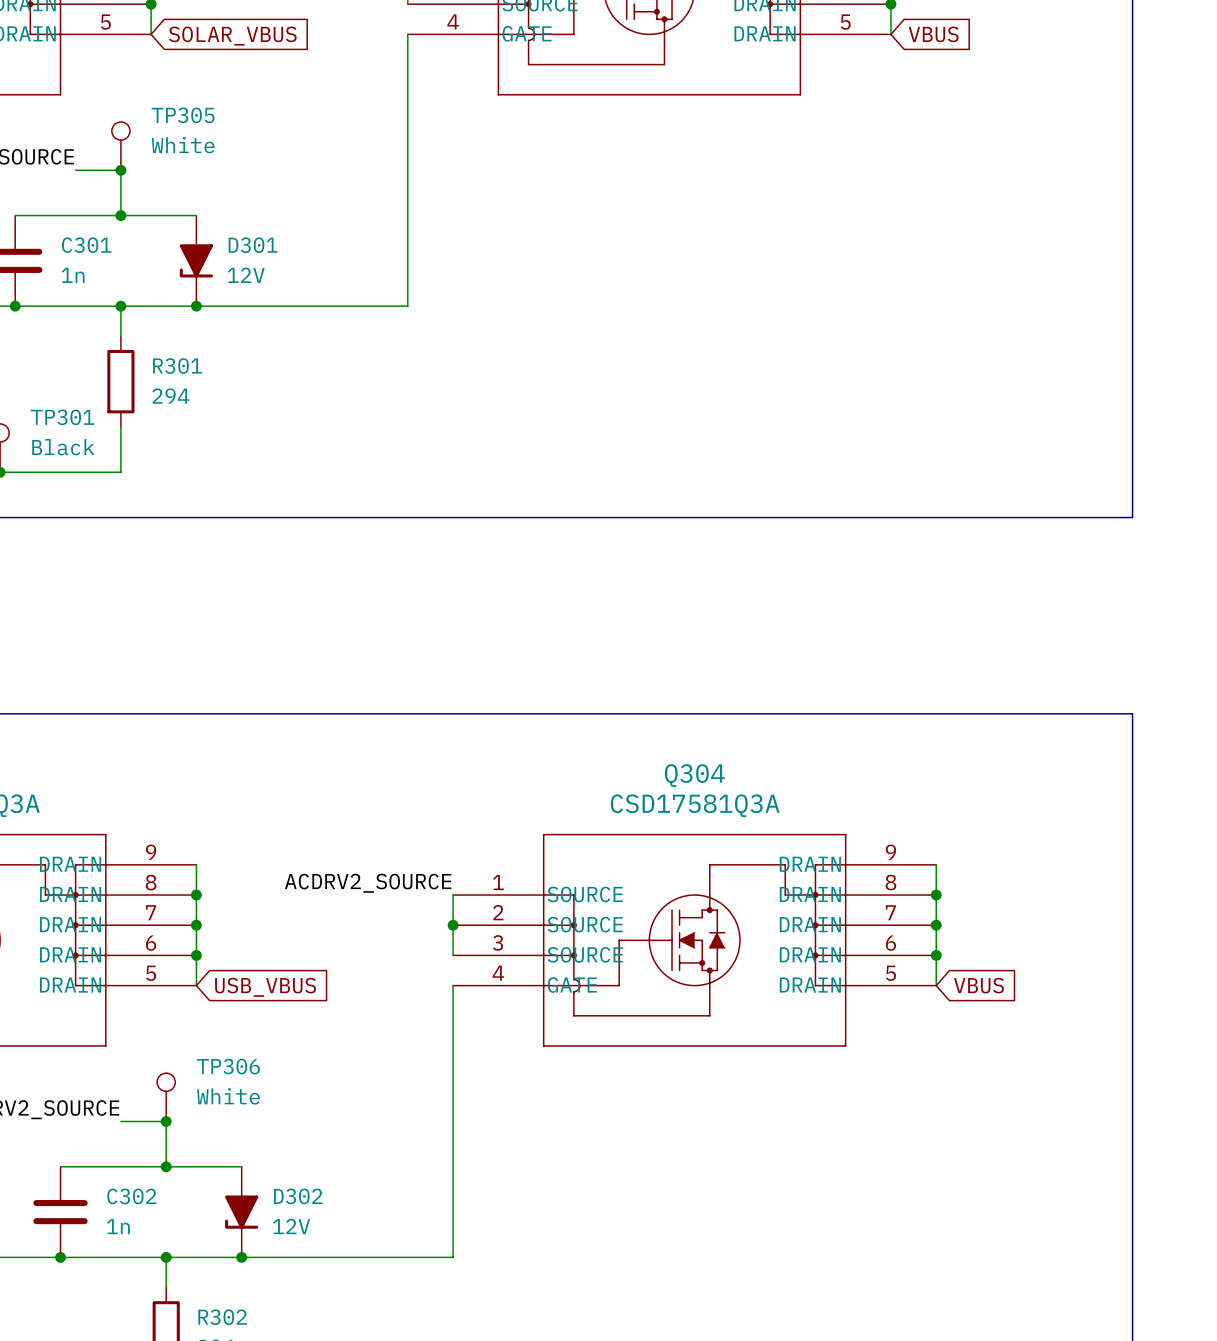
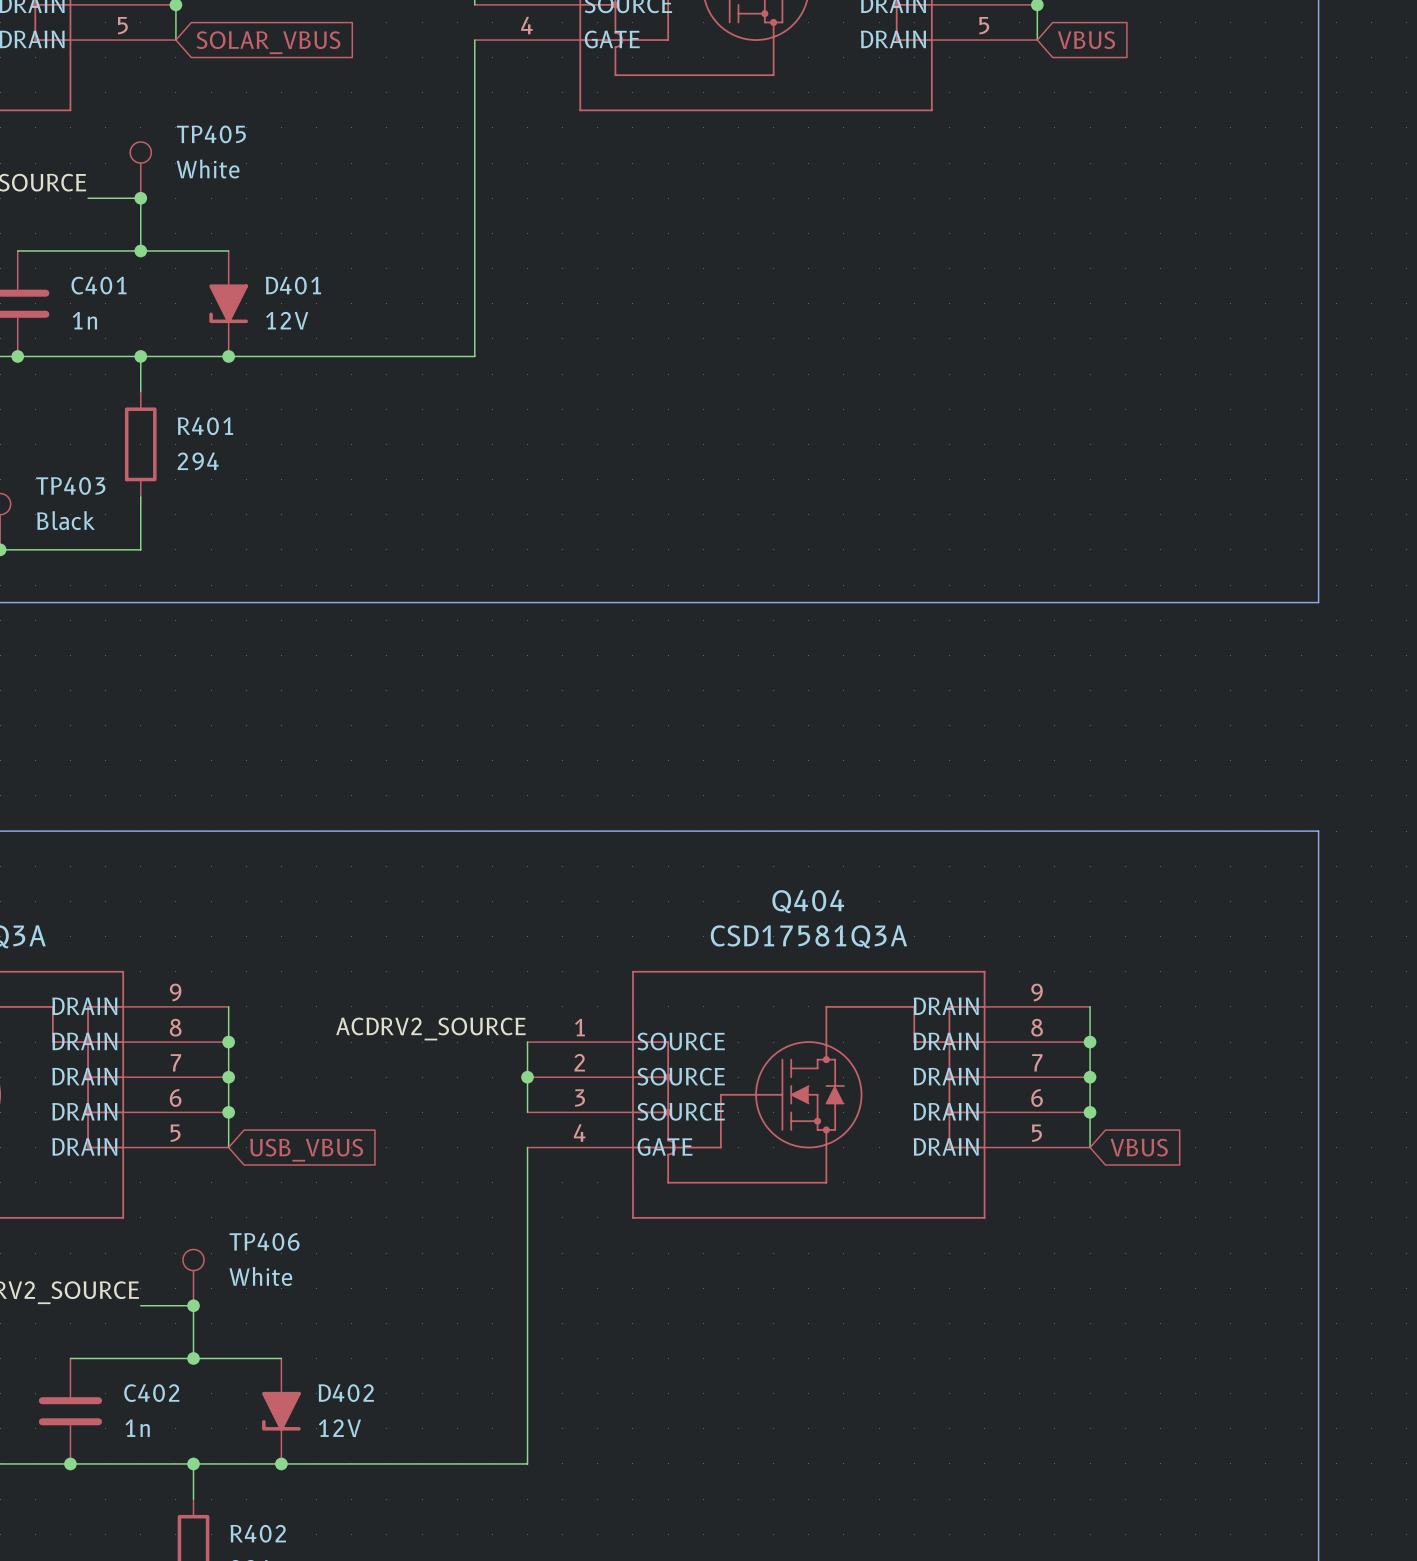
TP305 name: TP305 (183, 115) -> TP405 (211, 134)
C301 name: C301 (86, 245) -> C401 (99, 285)
D301 name: D301 (253, 245) -> D401 (293, 285)
R301 name: R301 (177, 366) -> R401 (205, 426)
TP301 name: TP301 (62, 417) -> TP403 (70, 485)
Q304 name: Q304 (694, 775) -> Q404 (808, 901)
TP306 name: TP306 (228, 1066) -> TP406 (264, 1241)
C302 name: C302 (131, 1196) -> C402 (151, 1393)
D302 name: D302 (298, 1196) -> D402 (346, 1393)
R302 name: R302 (222, 1317) -> R402 (258, 1533)

